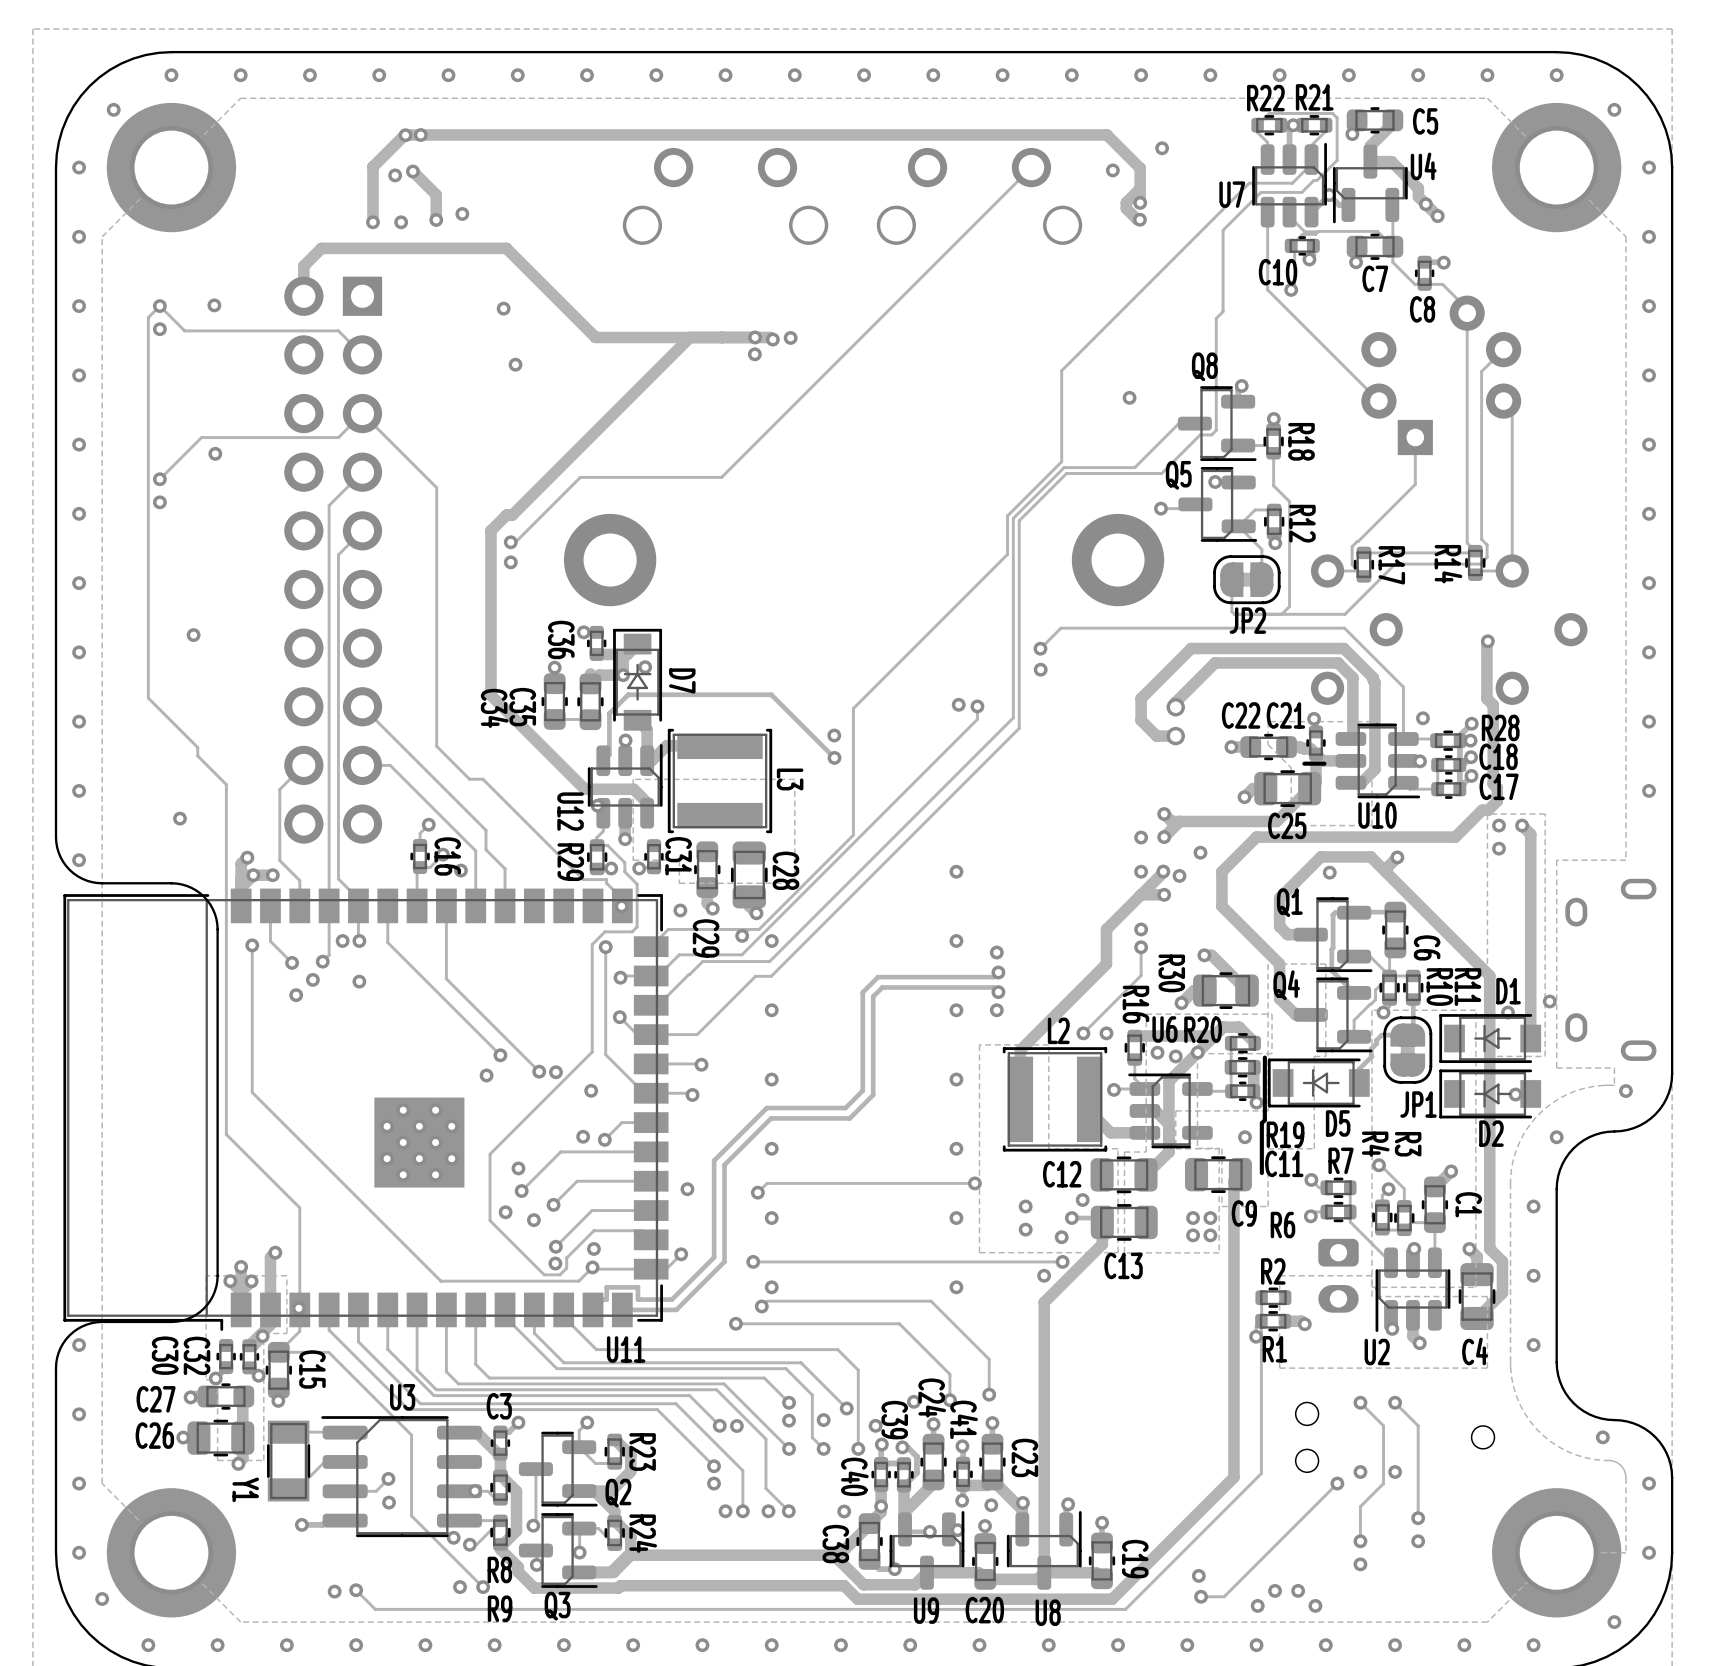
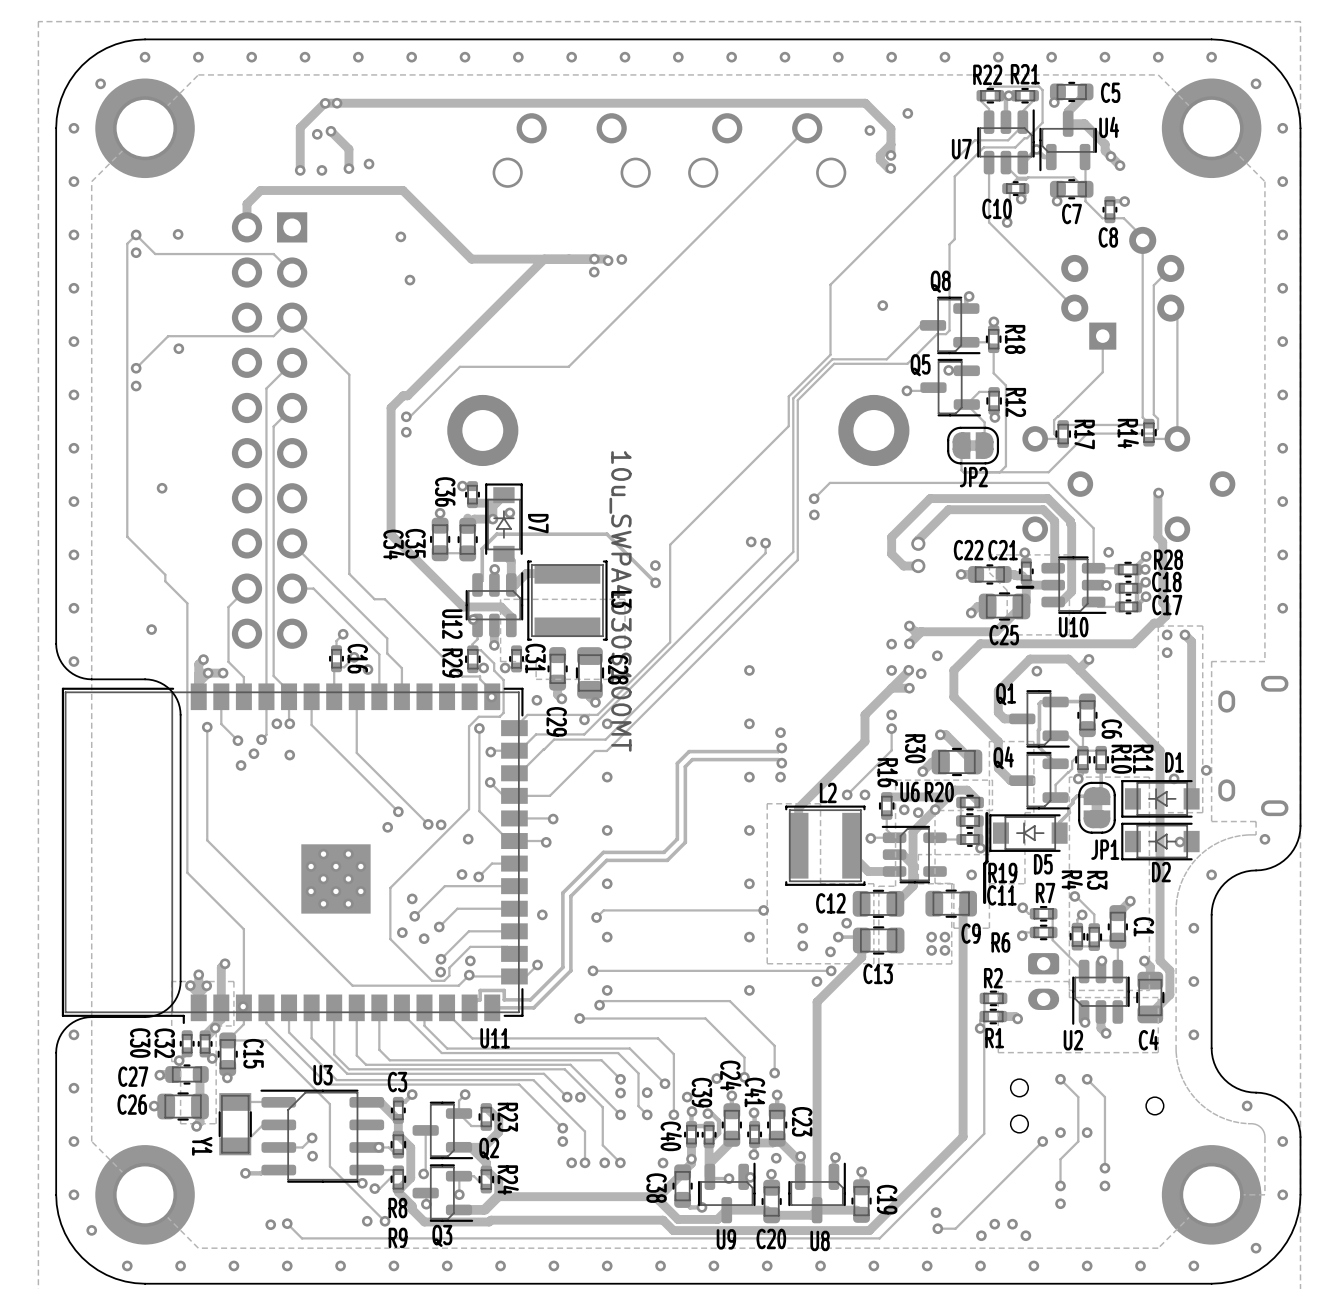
L3 value: none -> 10u_SWPA4030S100MT (620, 601)

